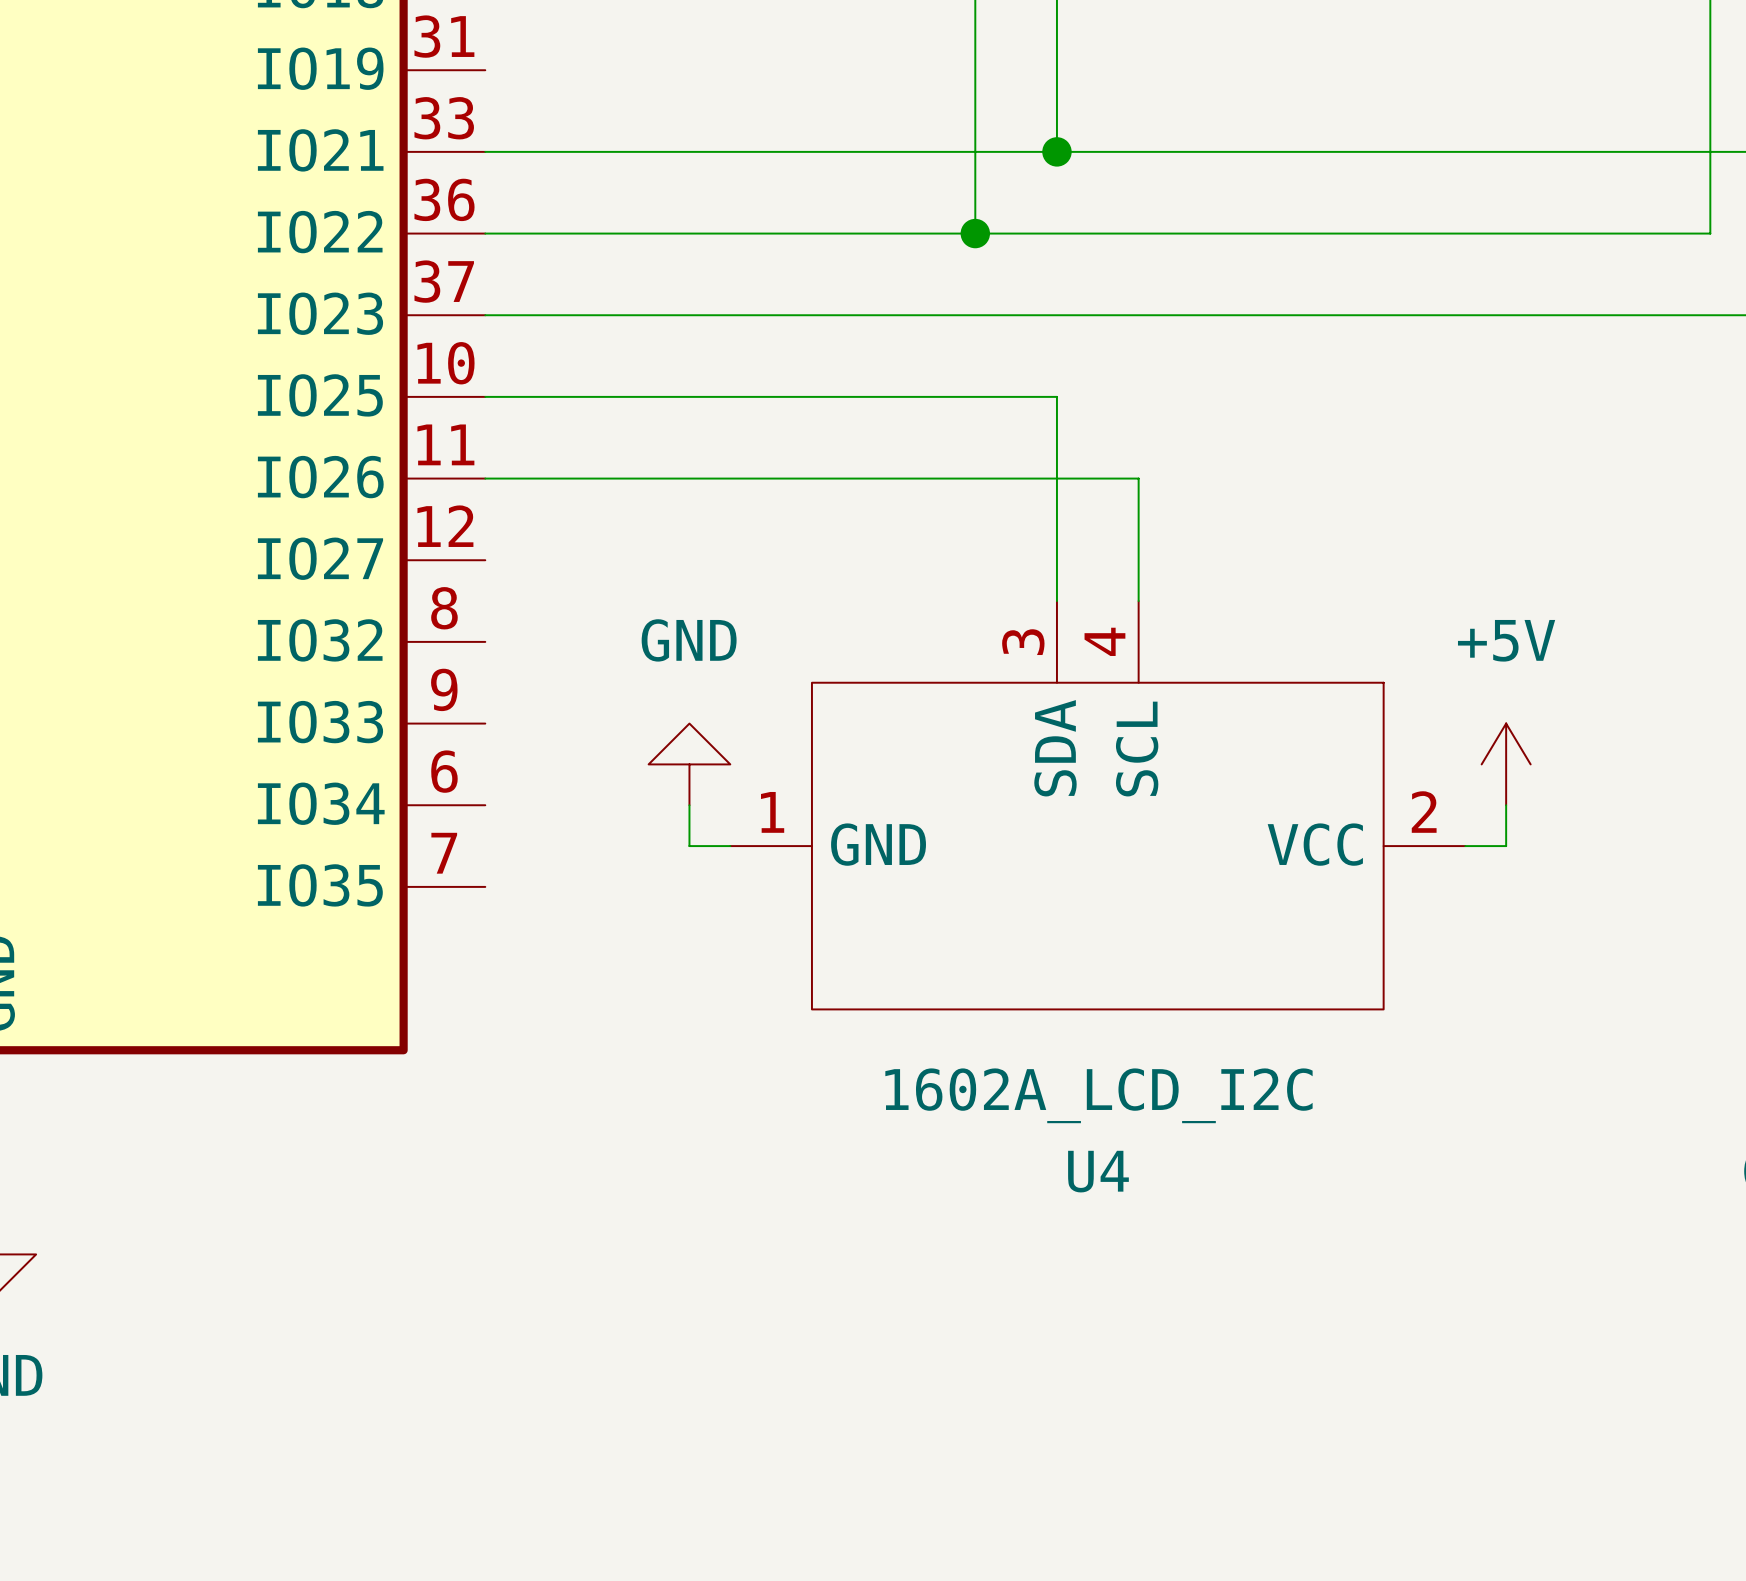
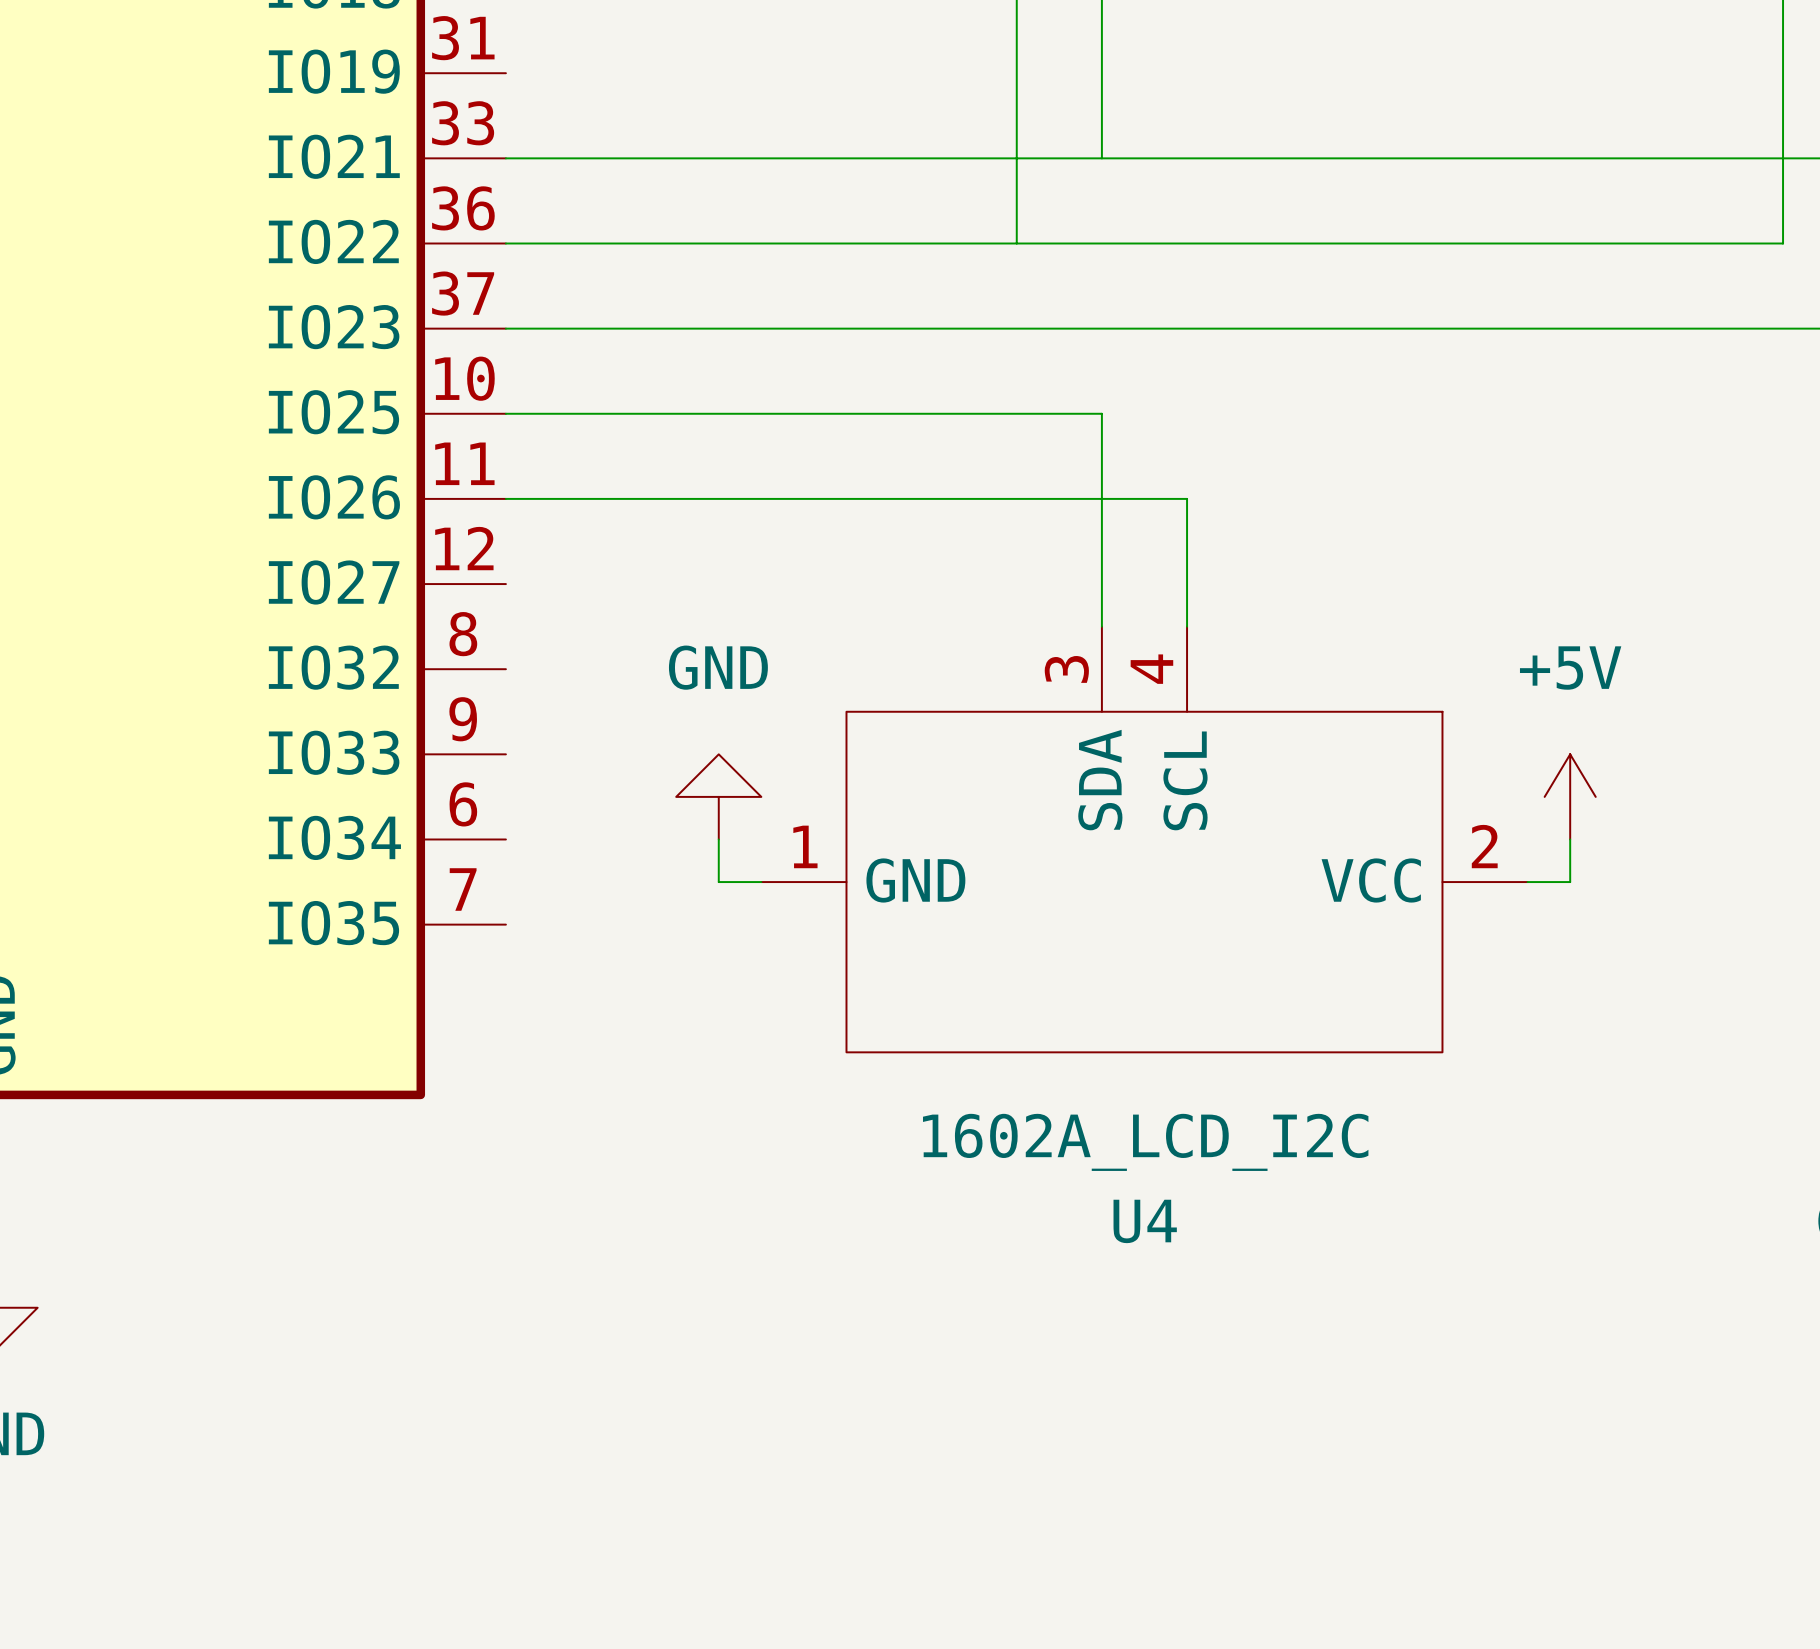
junction: (1056, 151) -> none
junction: (975, 233) -> none

